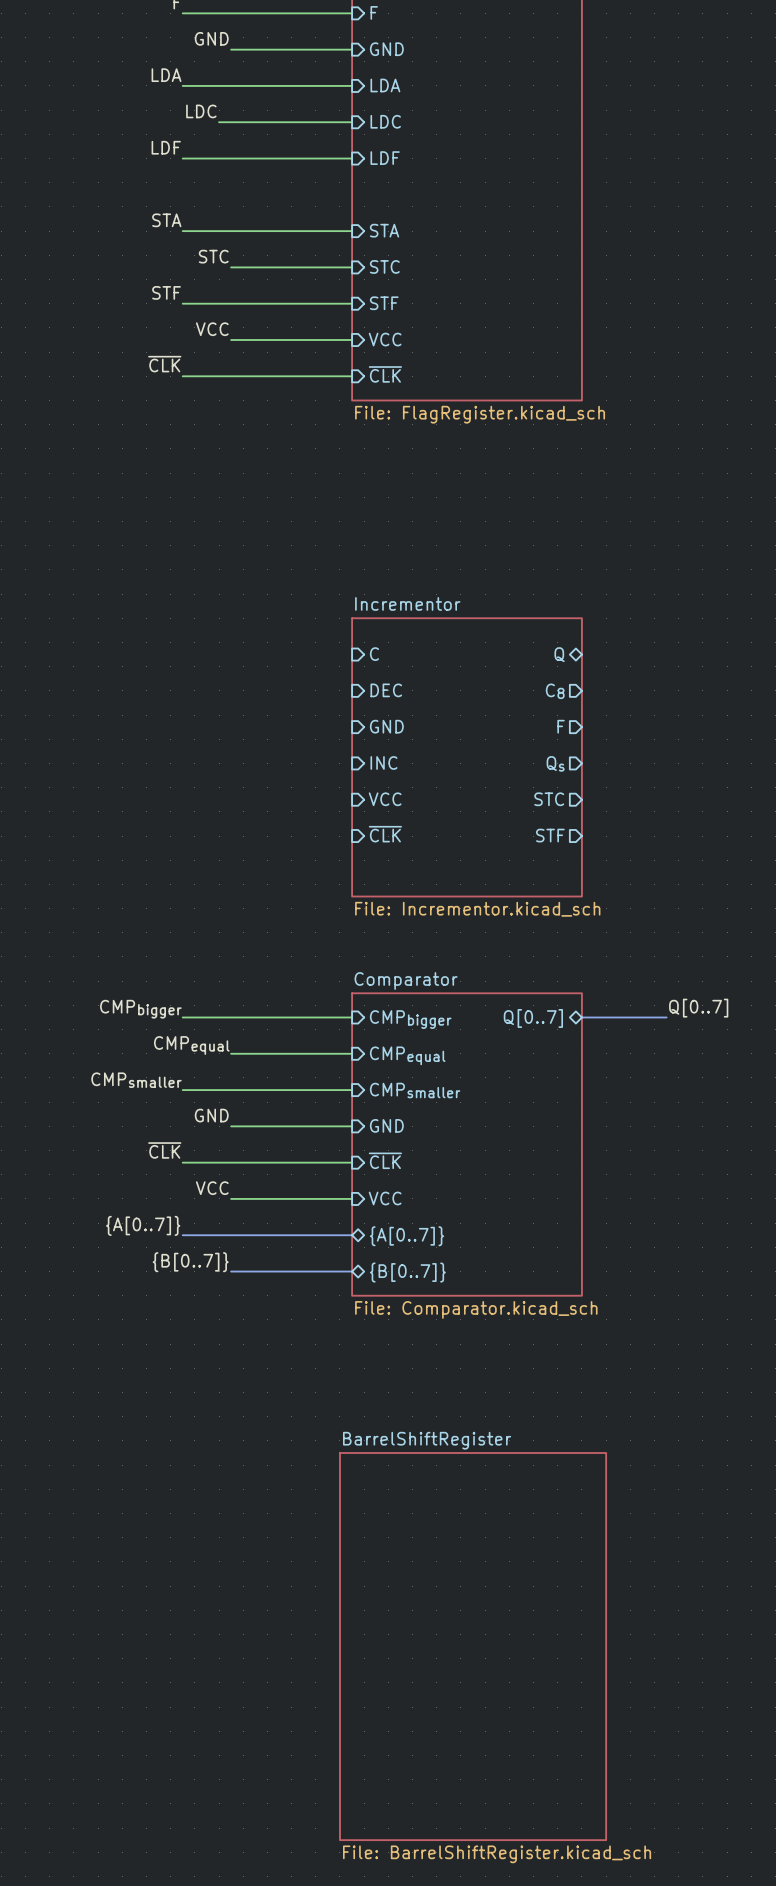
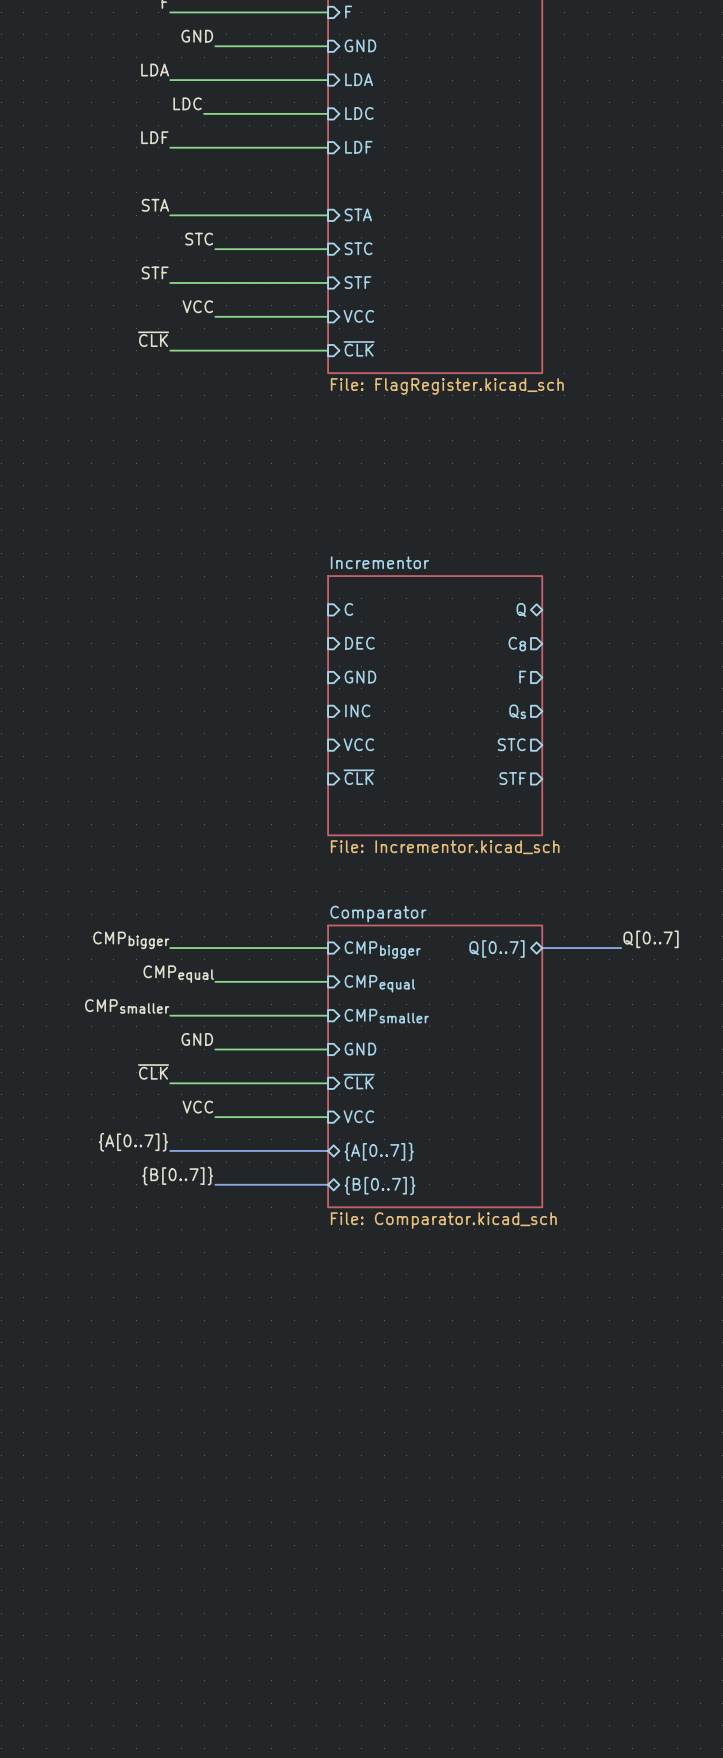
sheet BarrelShiftRegister: File: BarrelShiftRegister.kicad_sch (473, 1646) -> none

